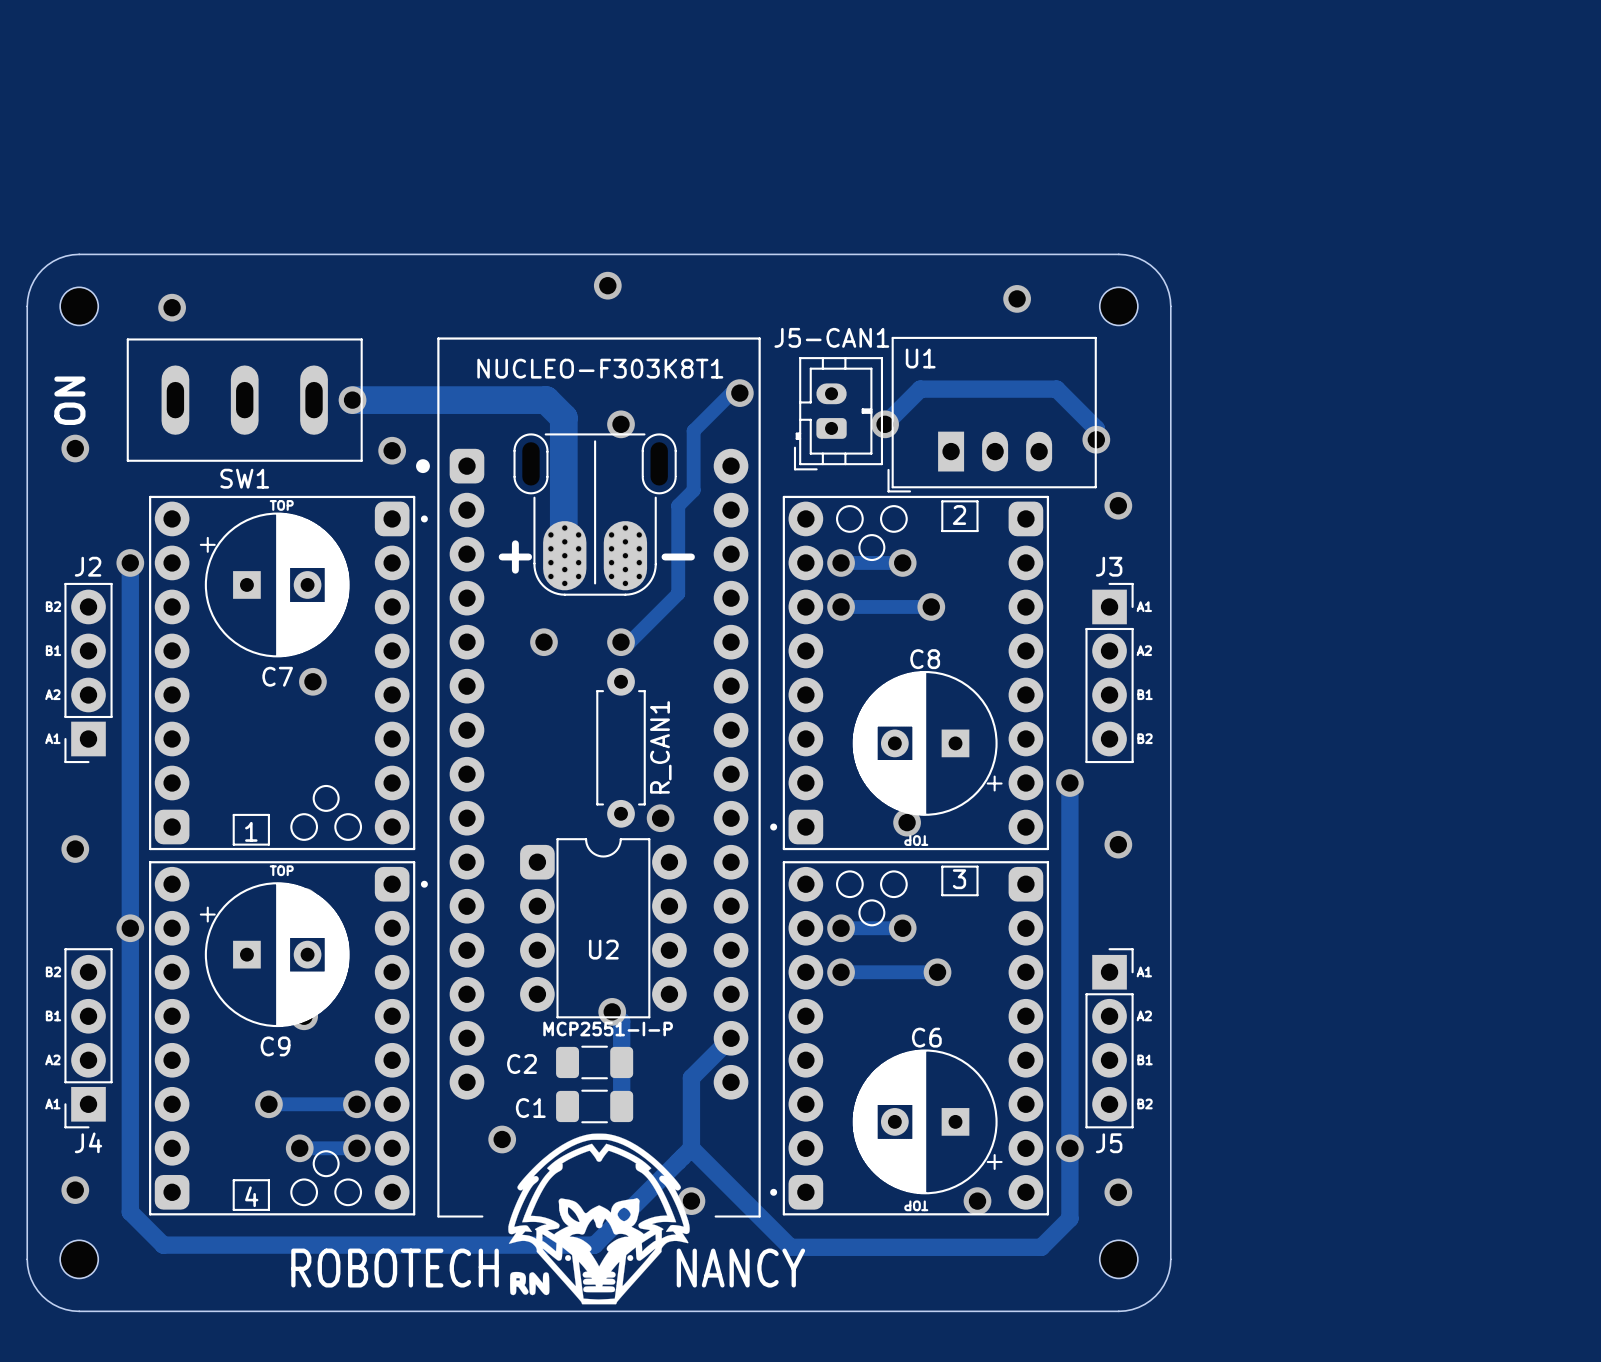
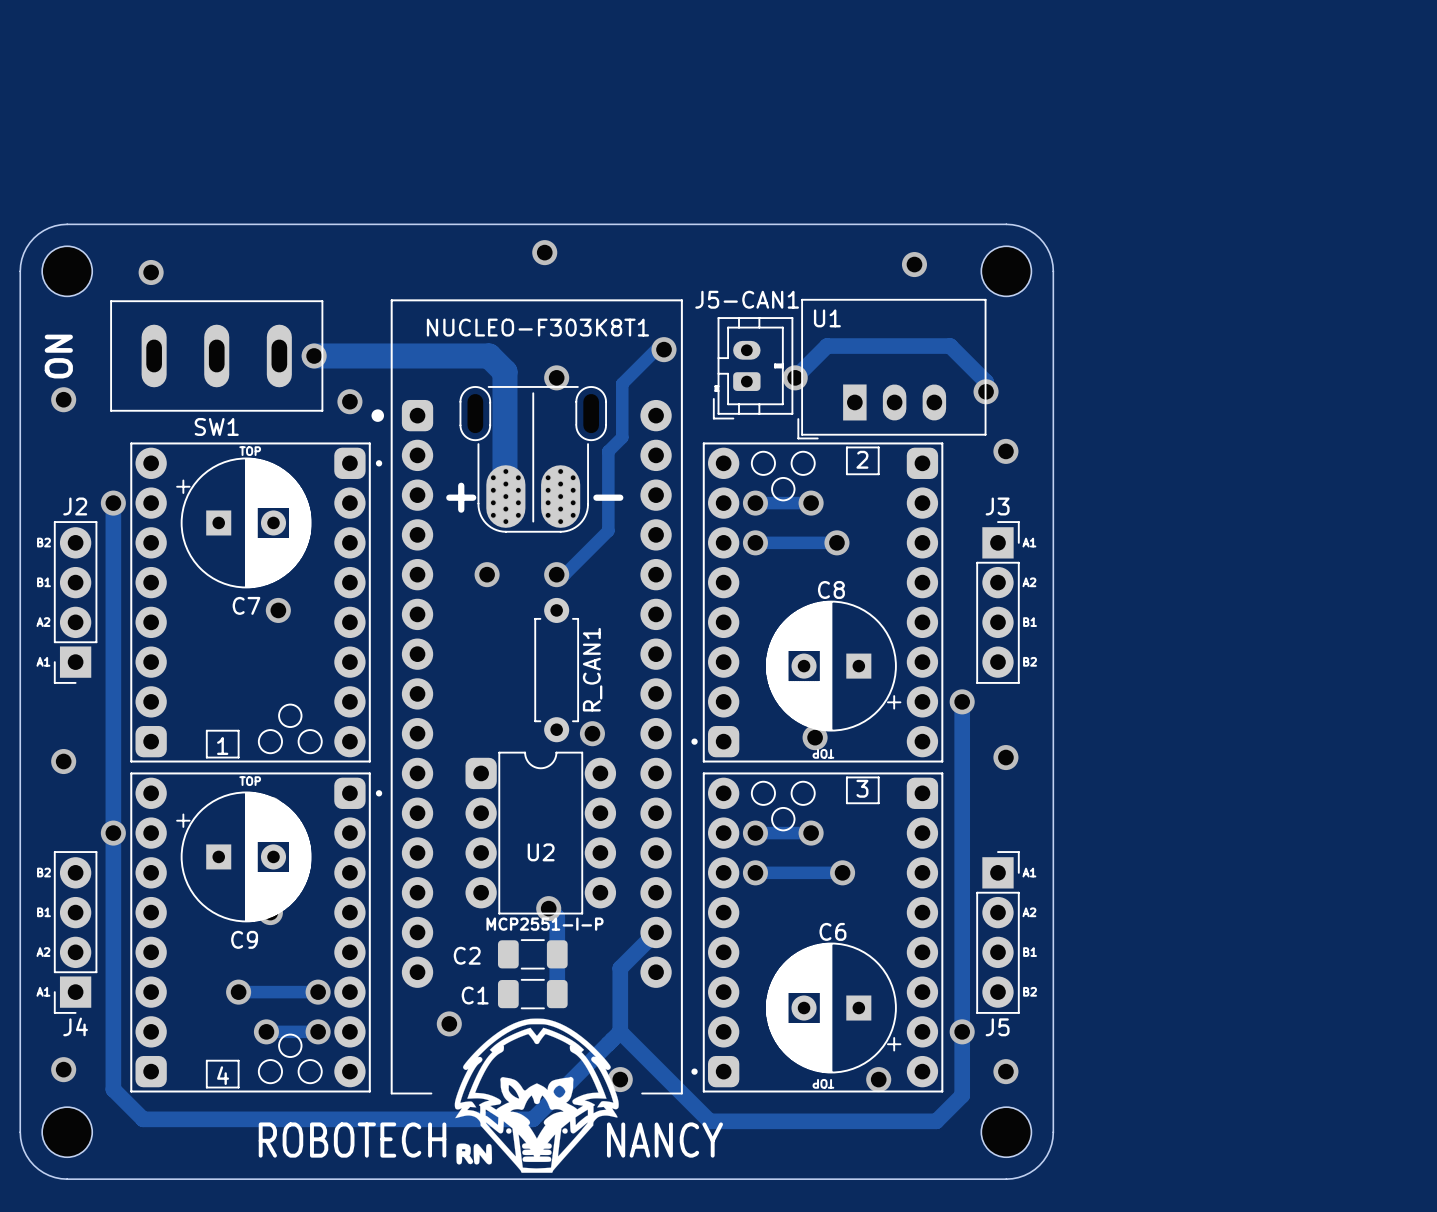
part footprint: [60, 287, 99, 326] -> [42, 246, 93, 297]
part footprint: [1099, 287, 1138, 326] -> [981, 246, 1032, 297]
part footprint: [60, 1240, 99, 1279] -> [42, 1107, 93, 1158]
part footprint: [1099, 1240, 1138, 1279] -> [981, 1107, 1032, 1158]

